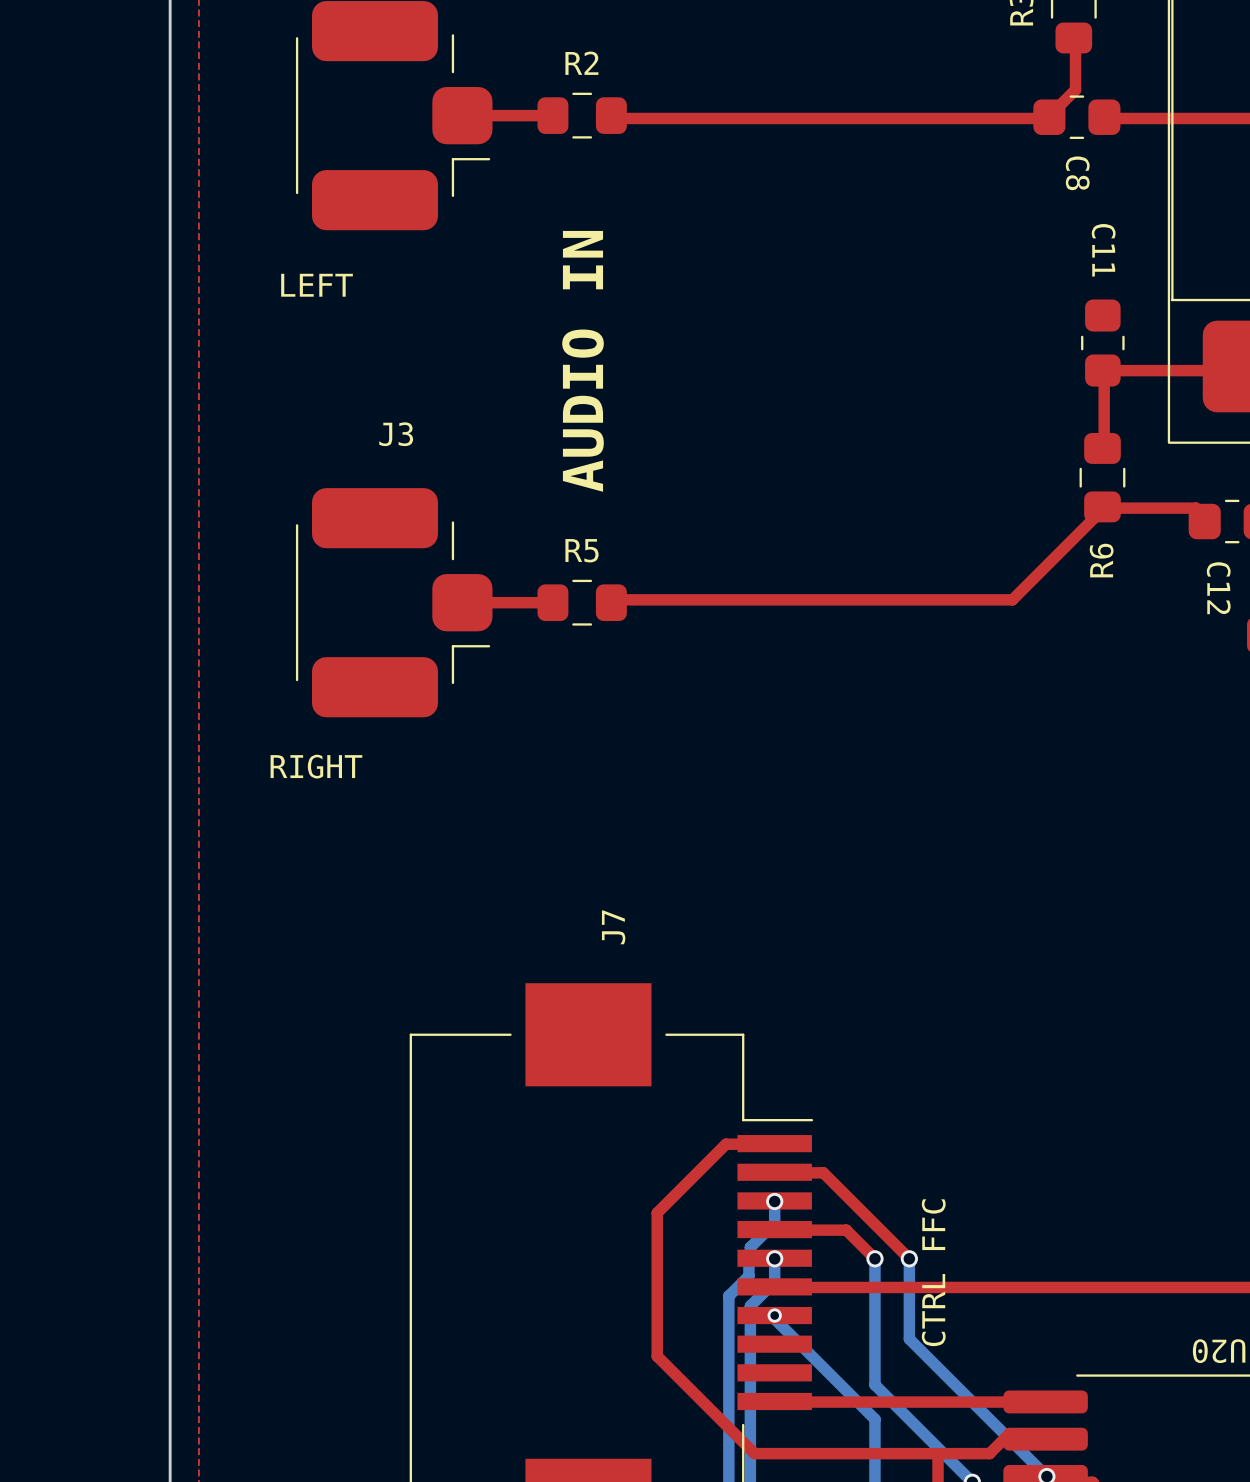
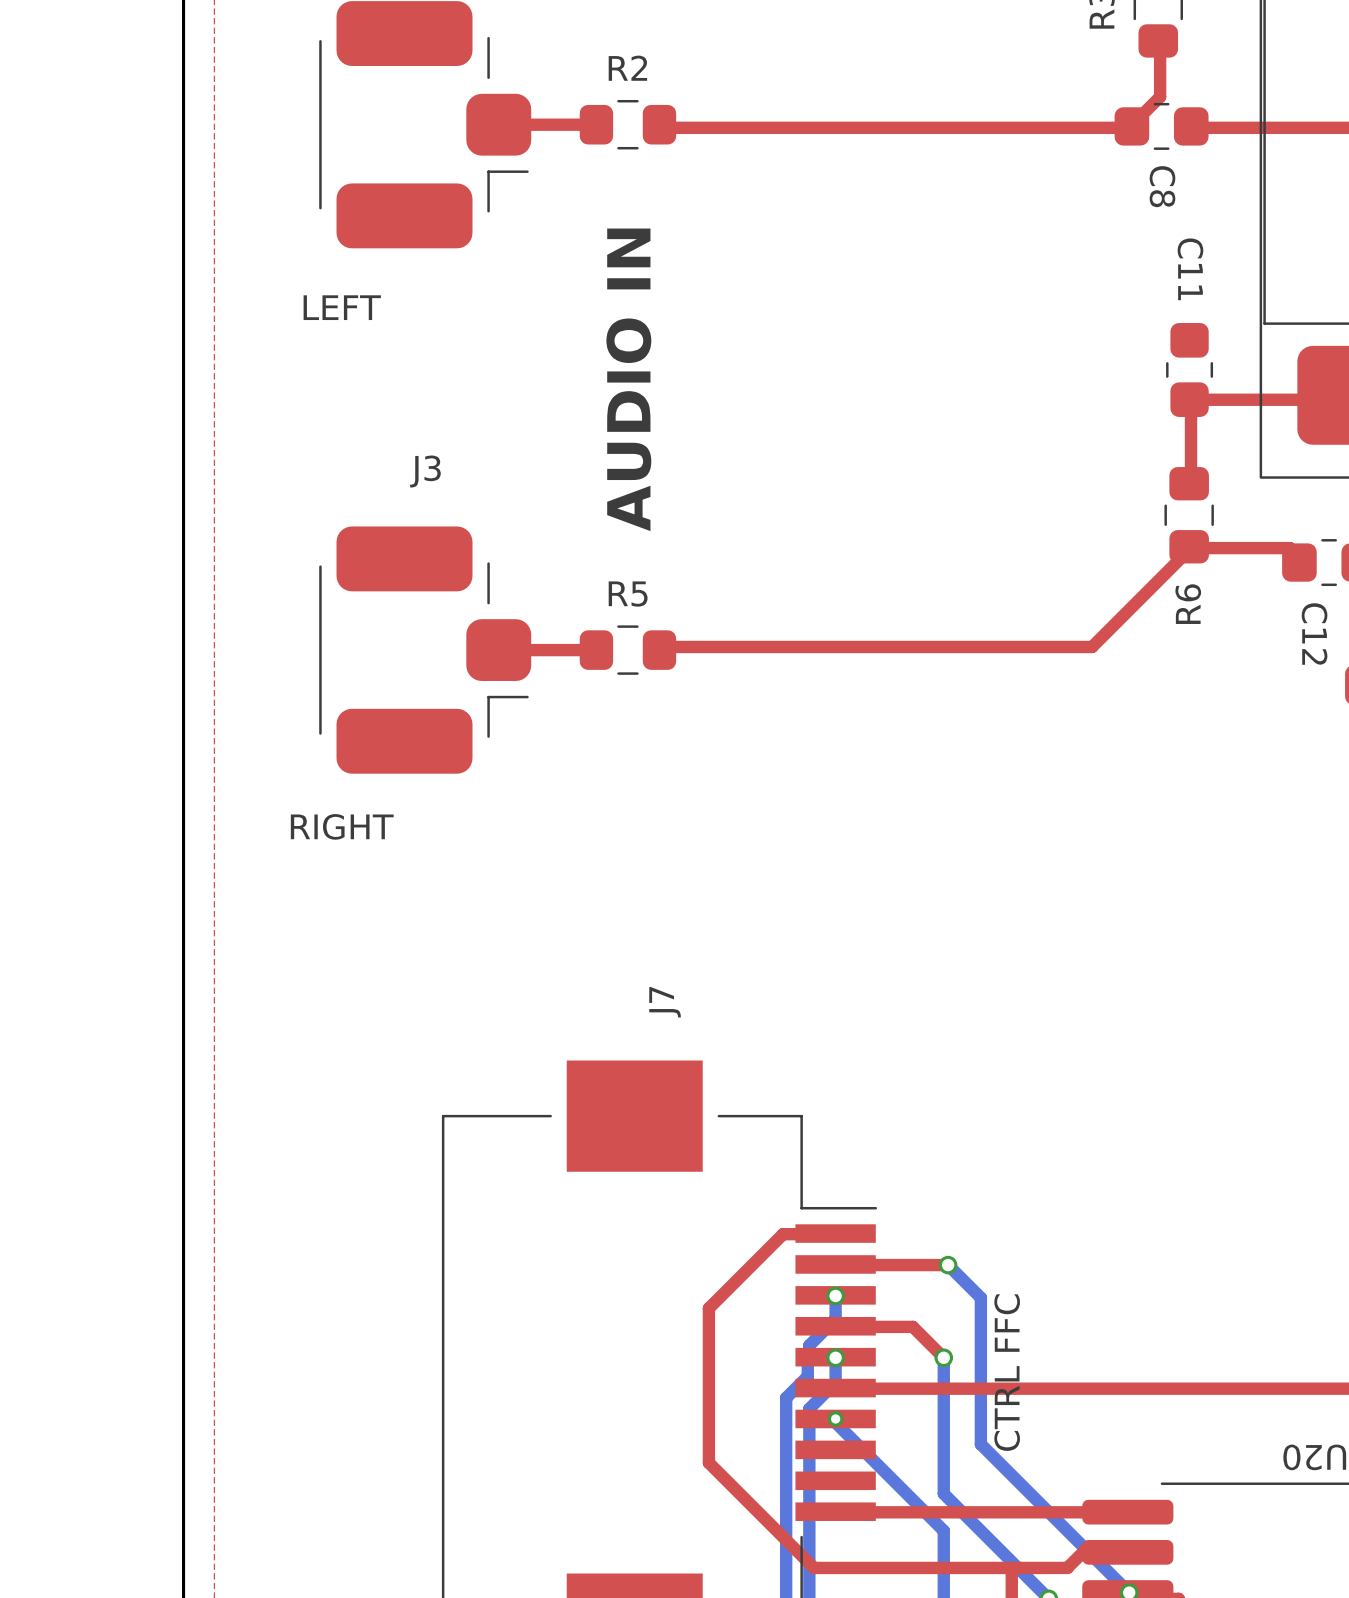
top track: (823, 1172) (909, 1258) -> (888, 1265) (948, 1265)
bottom track: none -> (948, 1265) (980, 1297) (980, 1357)
via position: (909, 1258) -> (948, 1265)

